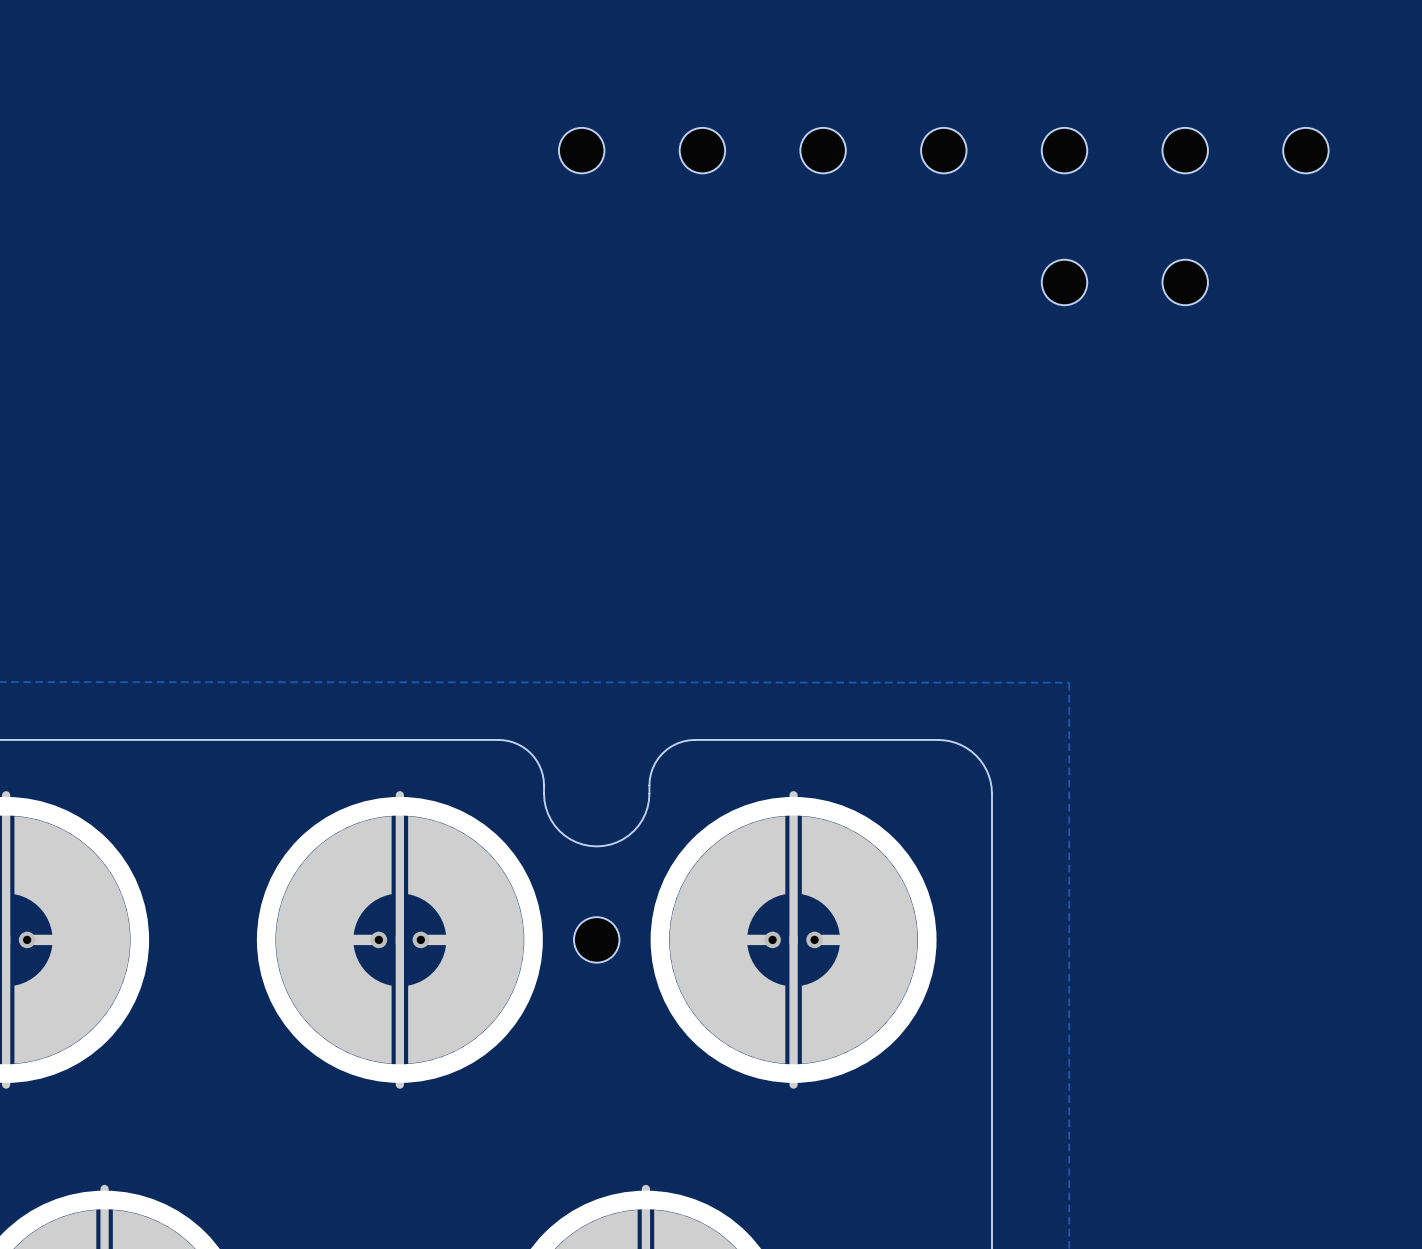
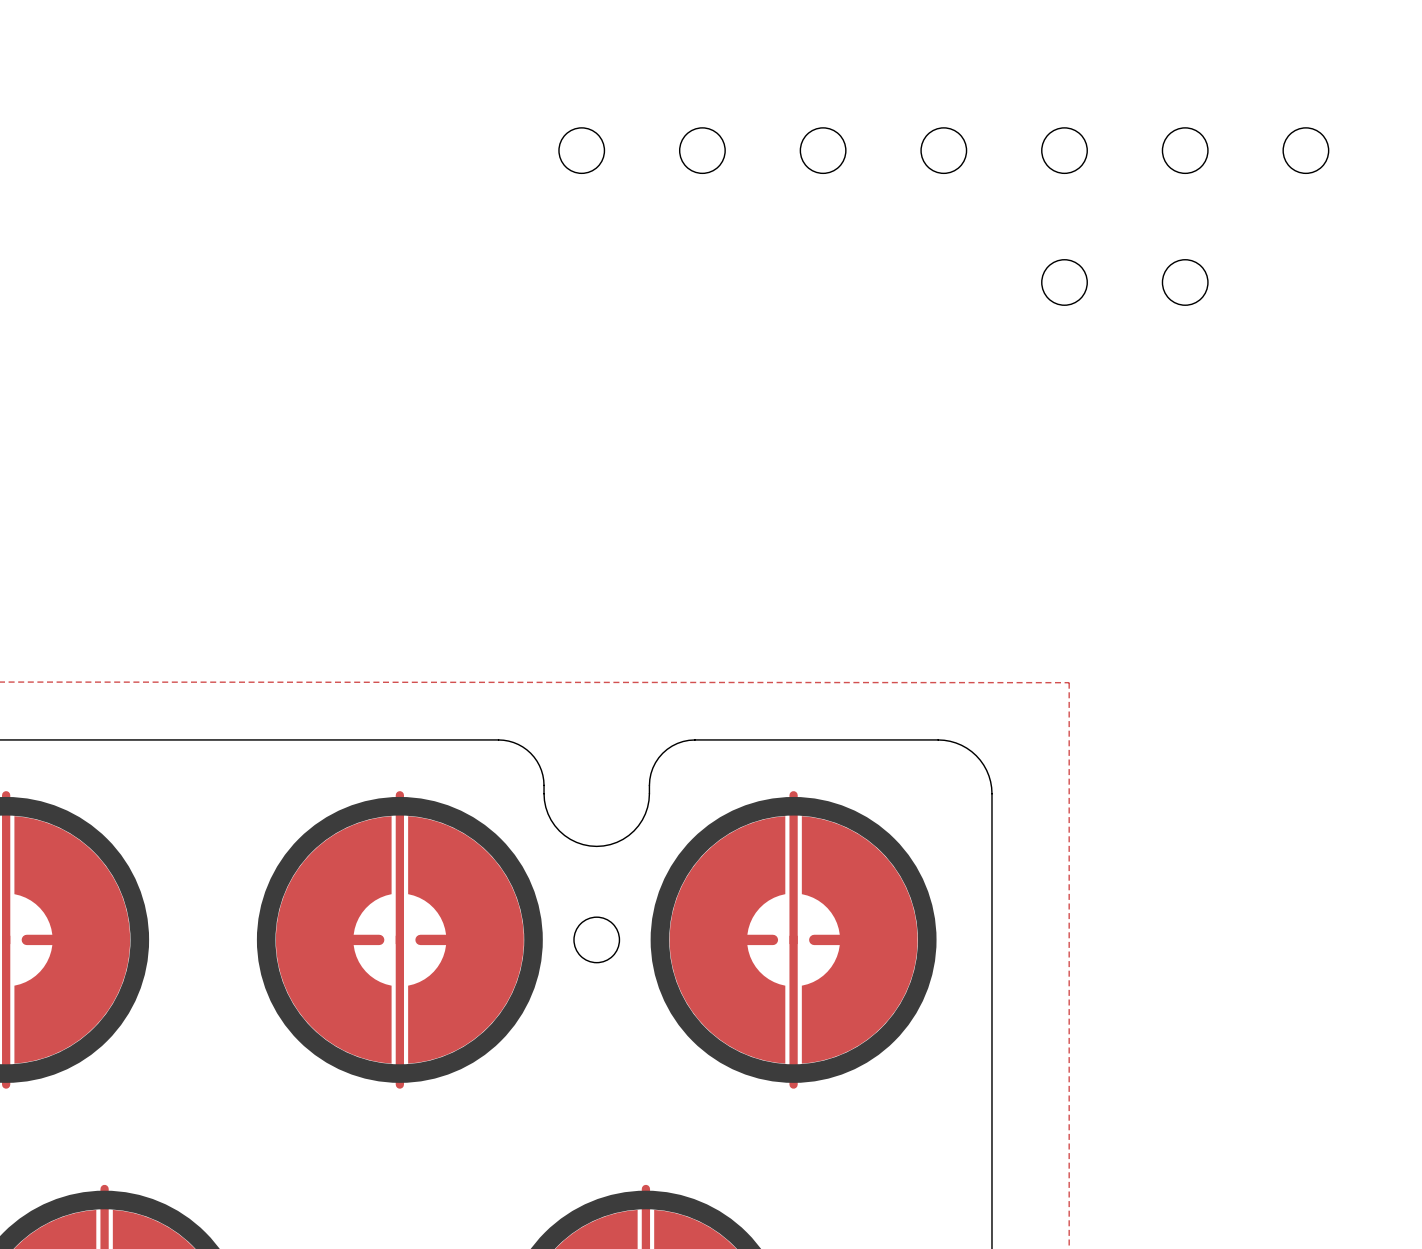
via: (27, 939) -> none
via: (378, 939) -> none
via: (420, 939) -> none
via: (772, 939) -> none
via: (814, 939) -> none

